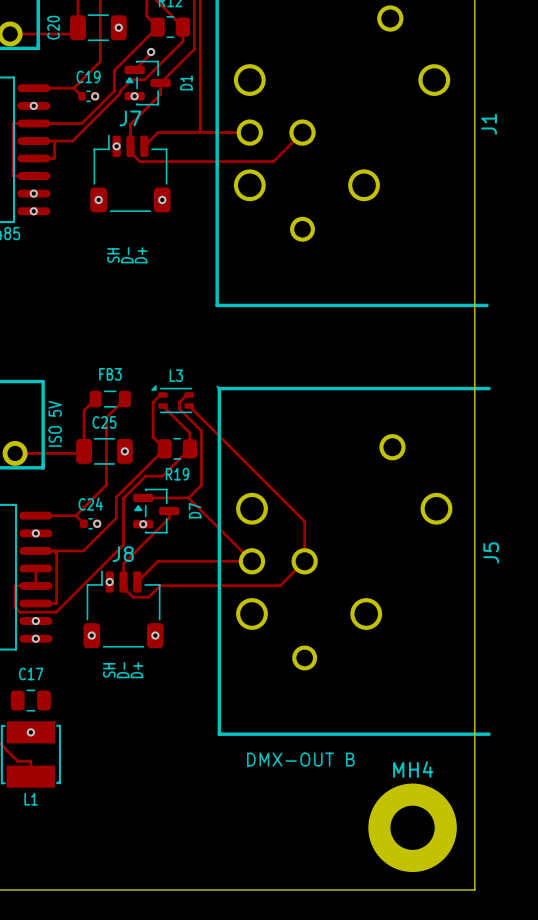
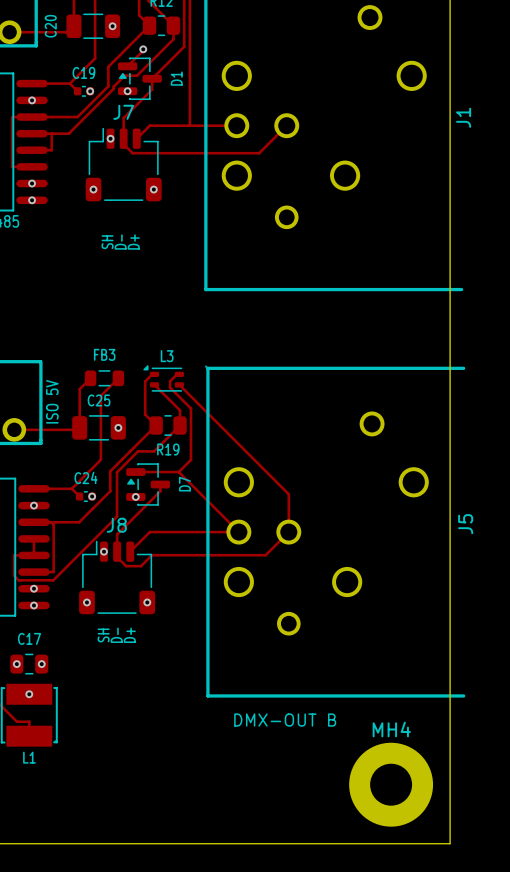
via: none -> (16, 664)
via: none -> (41, 664)

